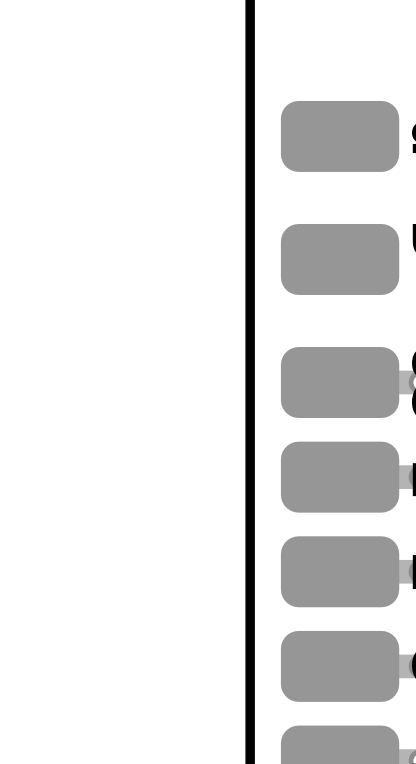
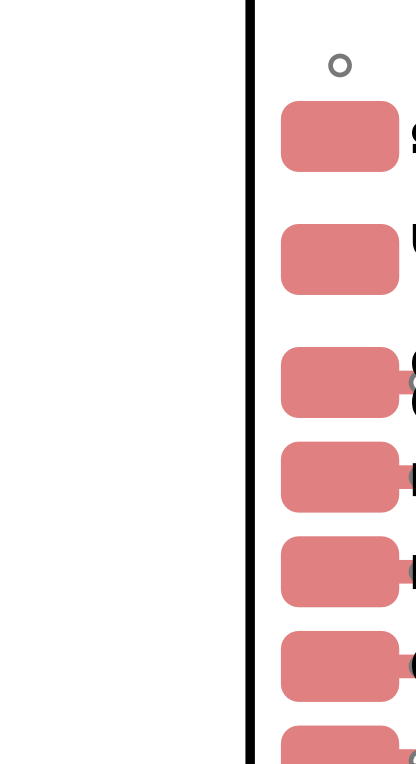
via: none -> (340, 65)

